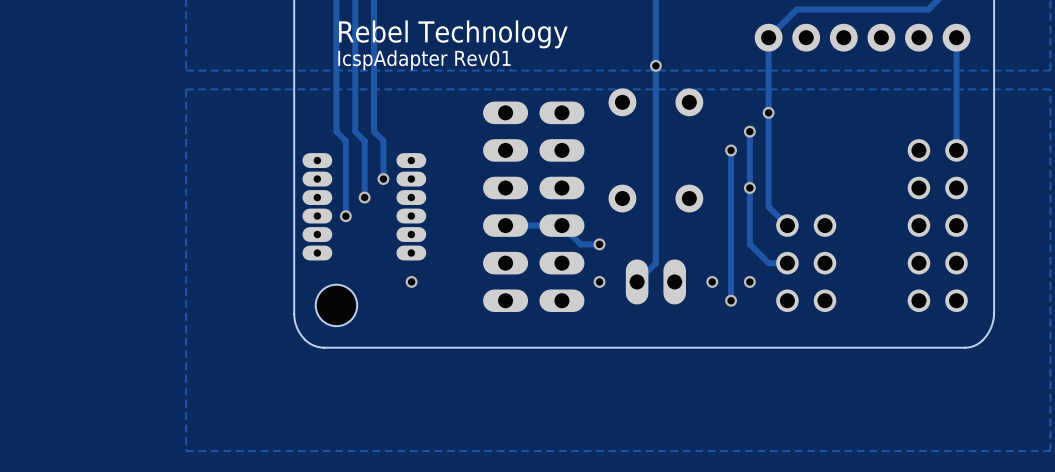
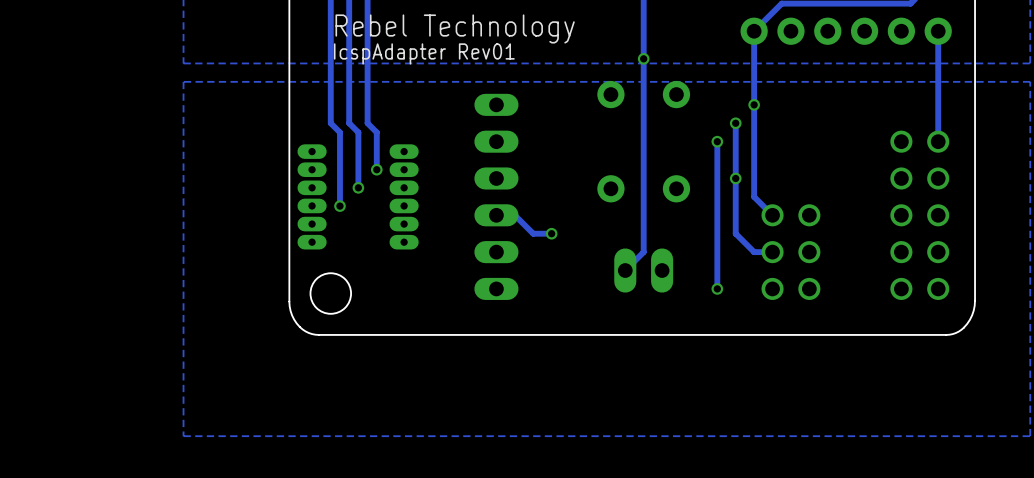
part: (561, 206) -> none
track: (524, 225) (561, 225) (580, 244) (599, 244) -> (514, 215) (533, 233) (551, 233)
via: none -> (551, 233)
via: (599, 244) -> none
via: (411, 281) -> none
via: (599, 281) -> none
via: (712, 281) -> none
via: (749, 281) -> none

